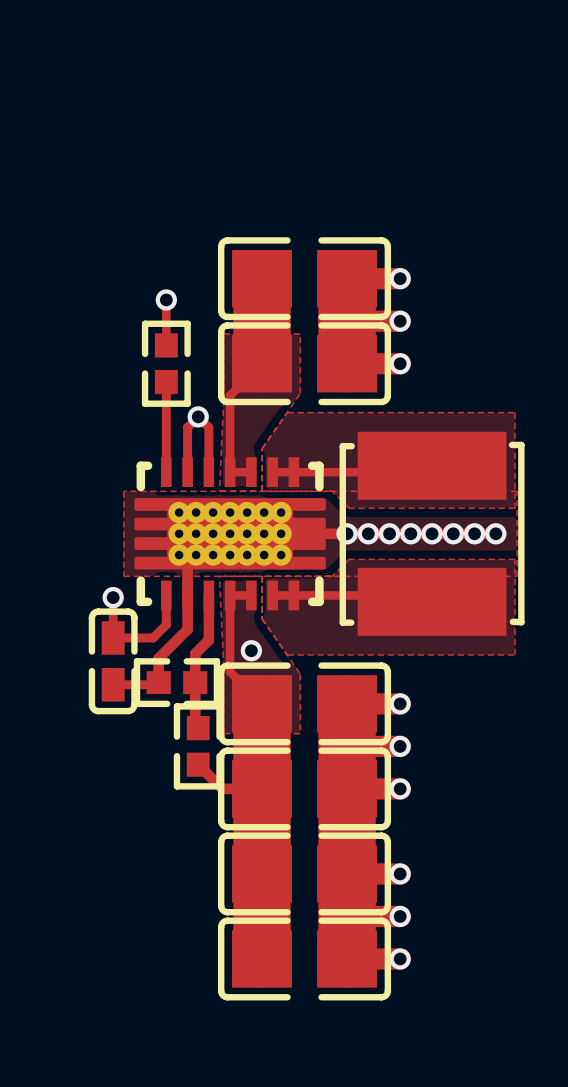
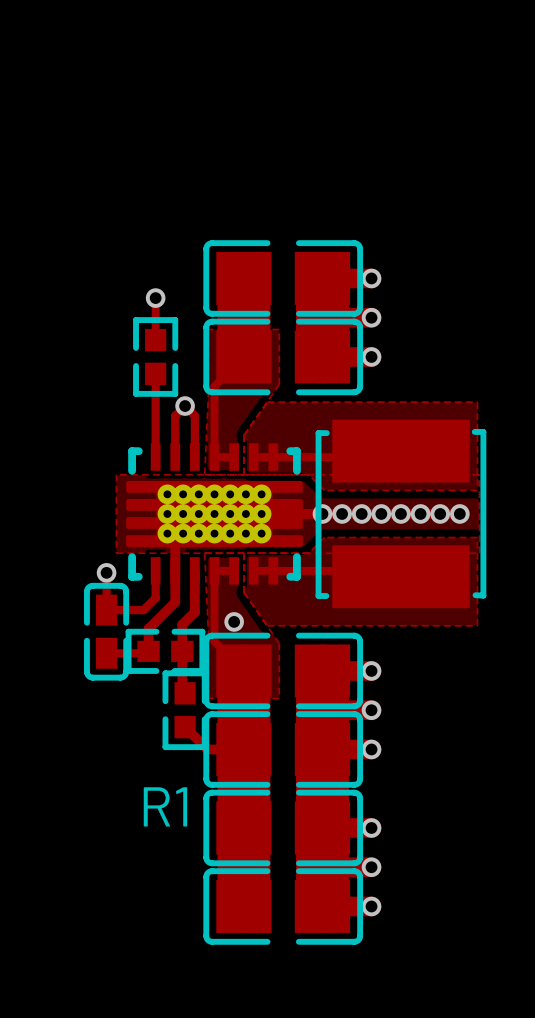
R1 name: none -> R1 (165, 806)

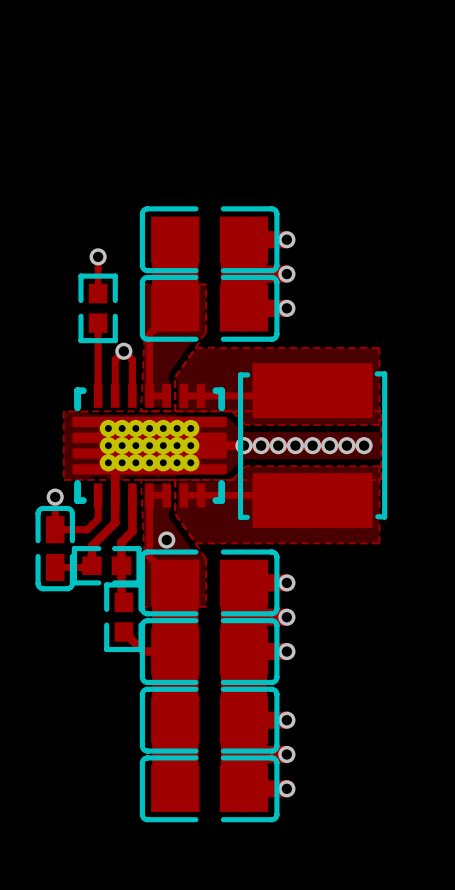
R1 name: R1 (165, 806) -> none

